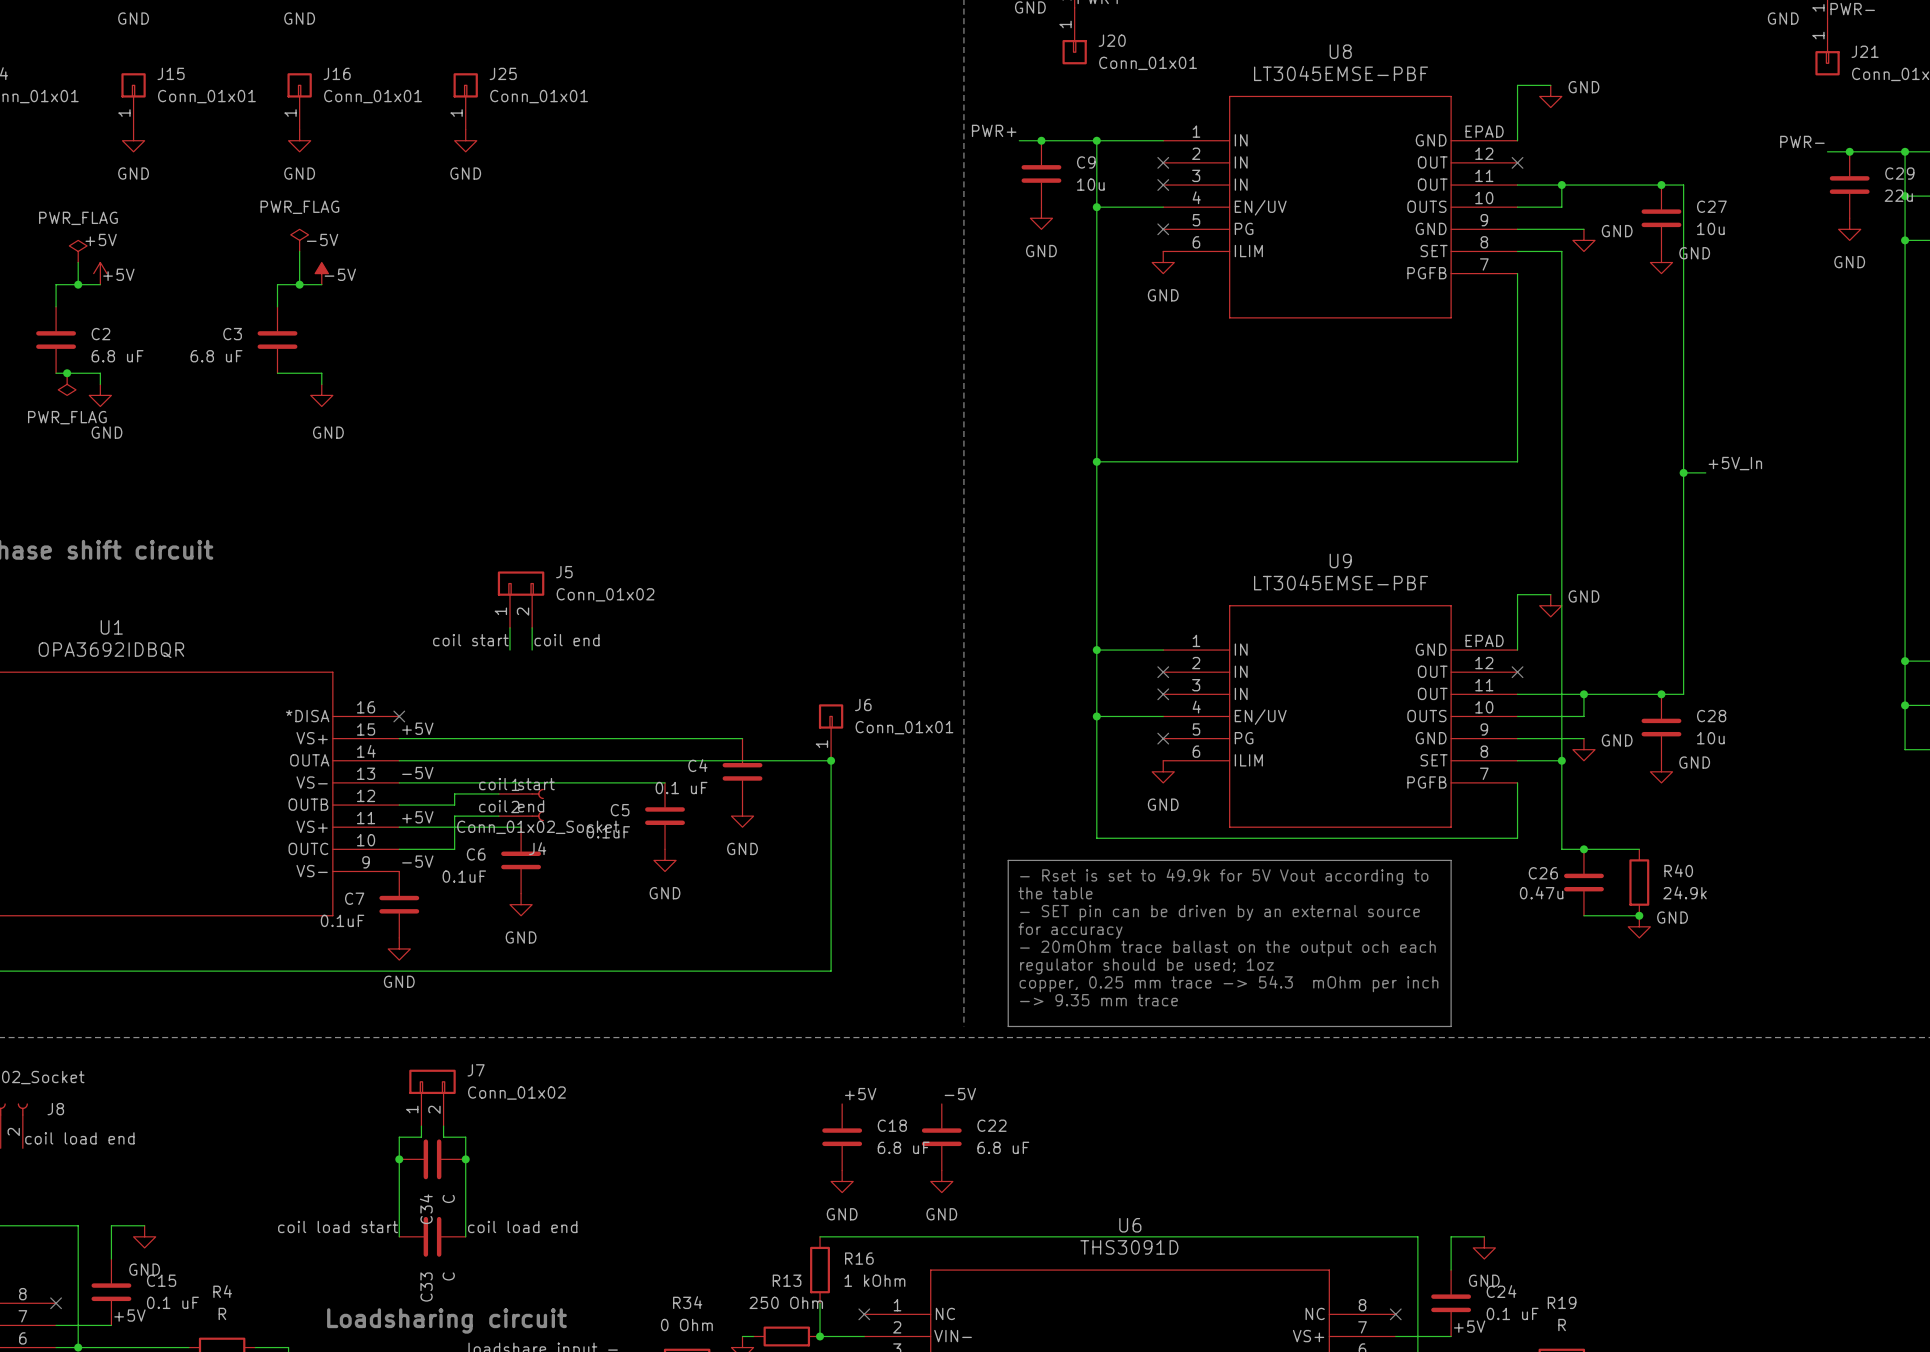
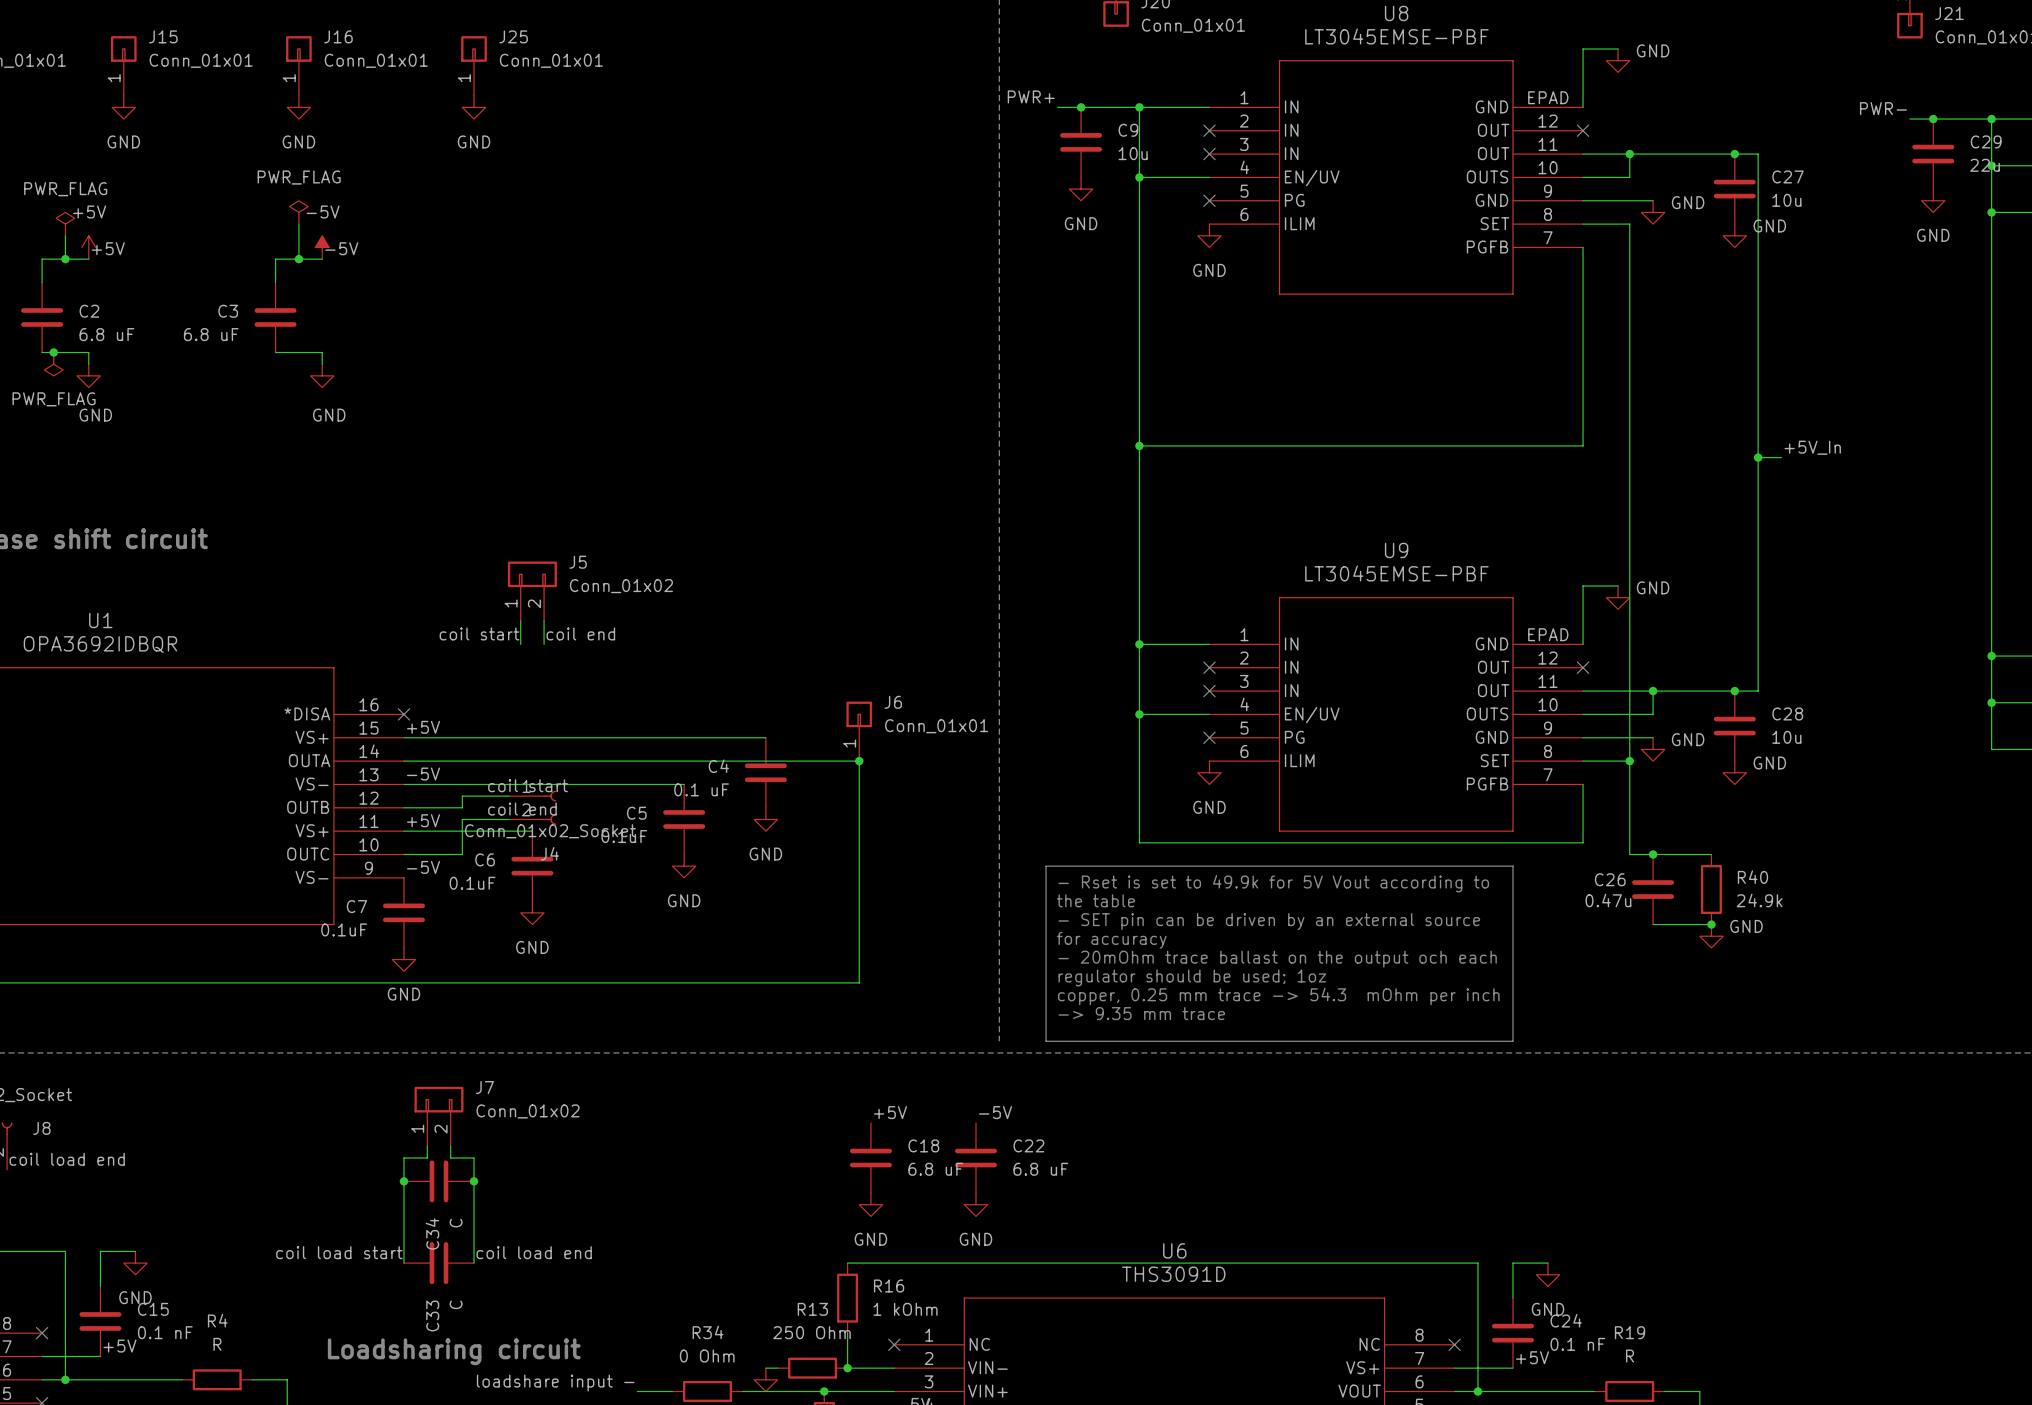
C15 value: 0.1 uF (172, 1302) -> 0.1 nF (165, 1332)
C24 value: 0.1 uF (1512, 1313) -> 0.1 nF (1577, 1344)

